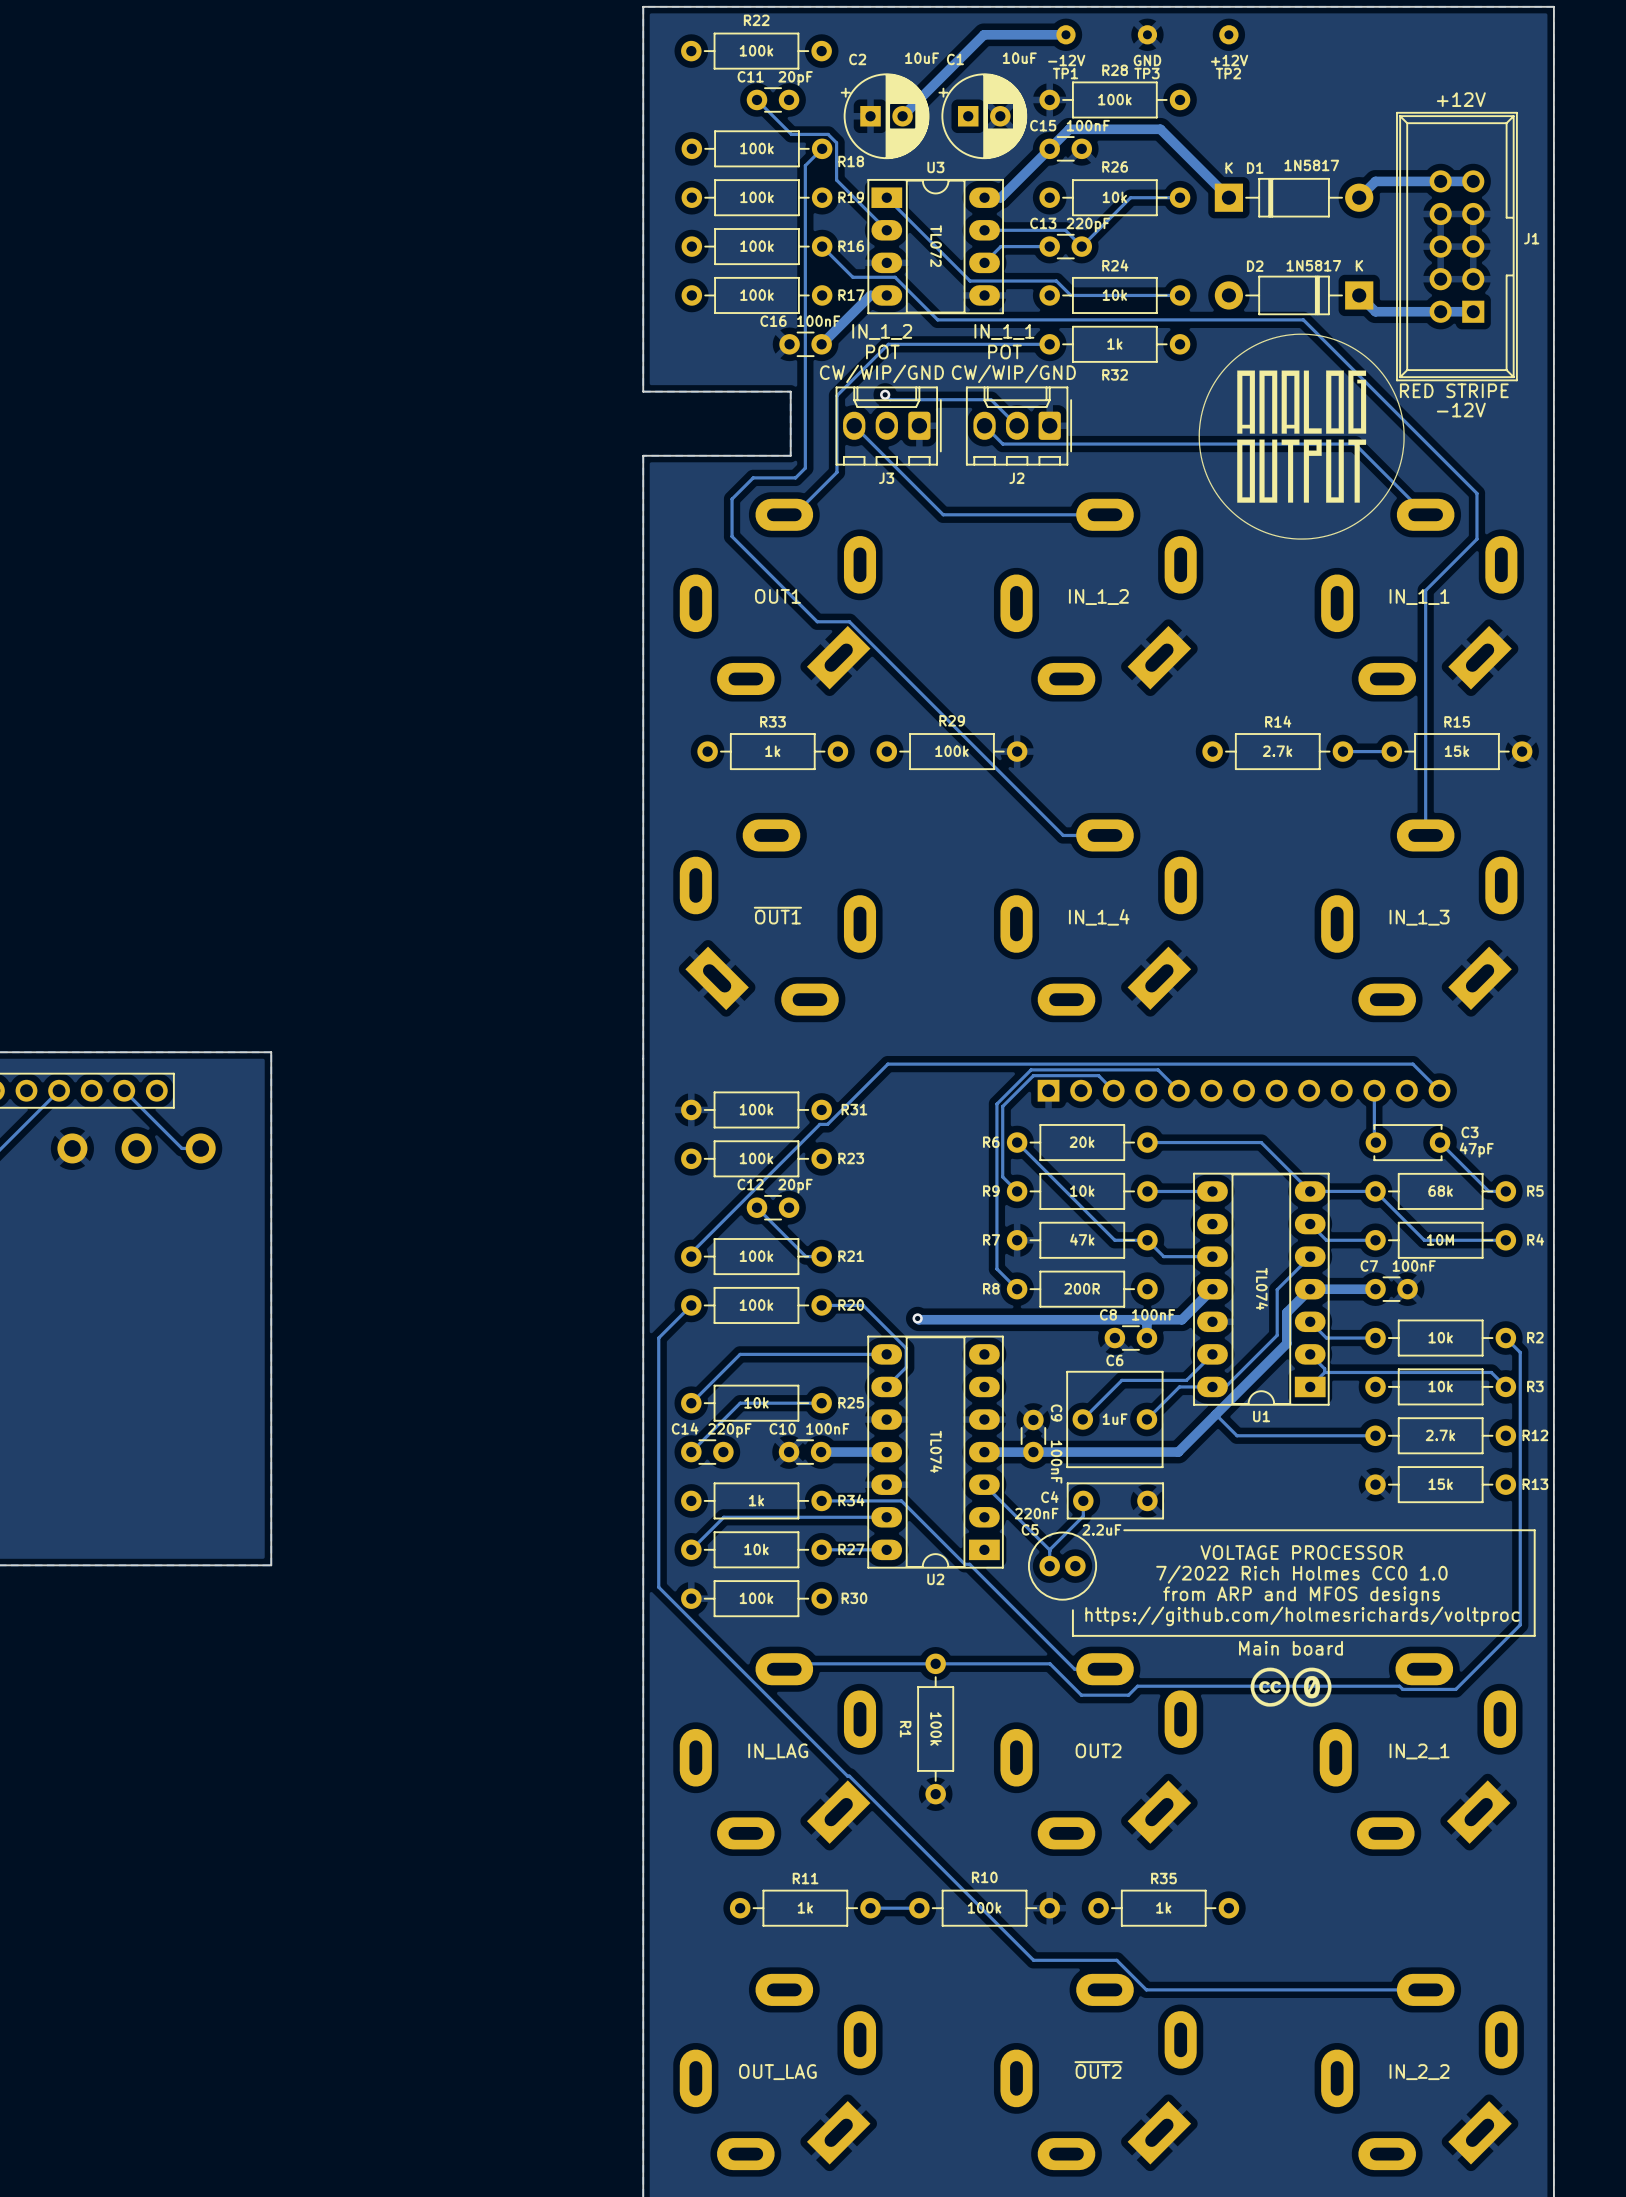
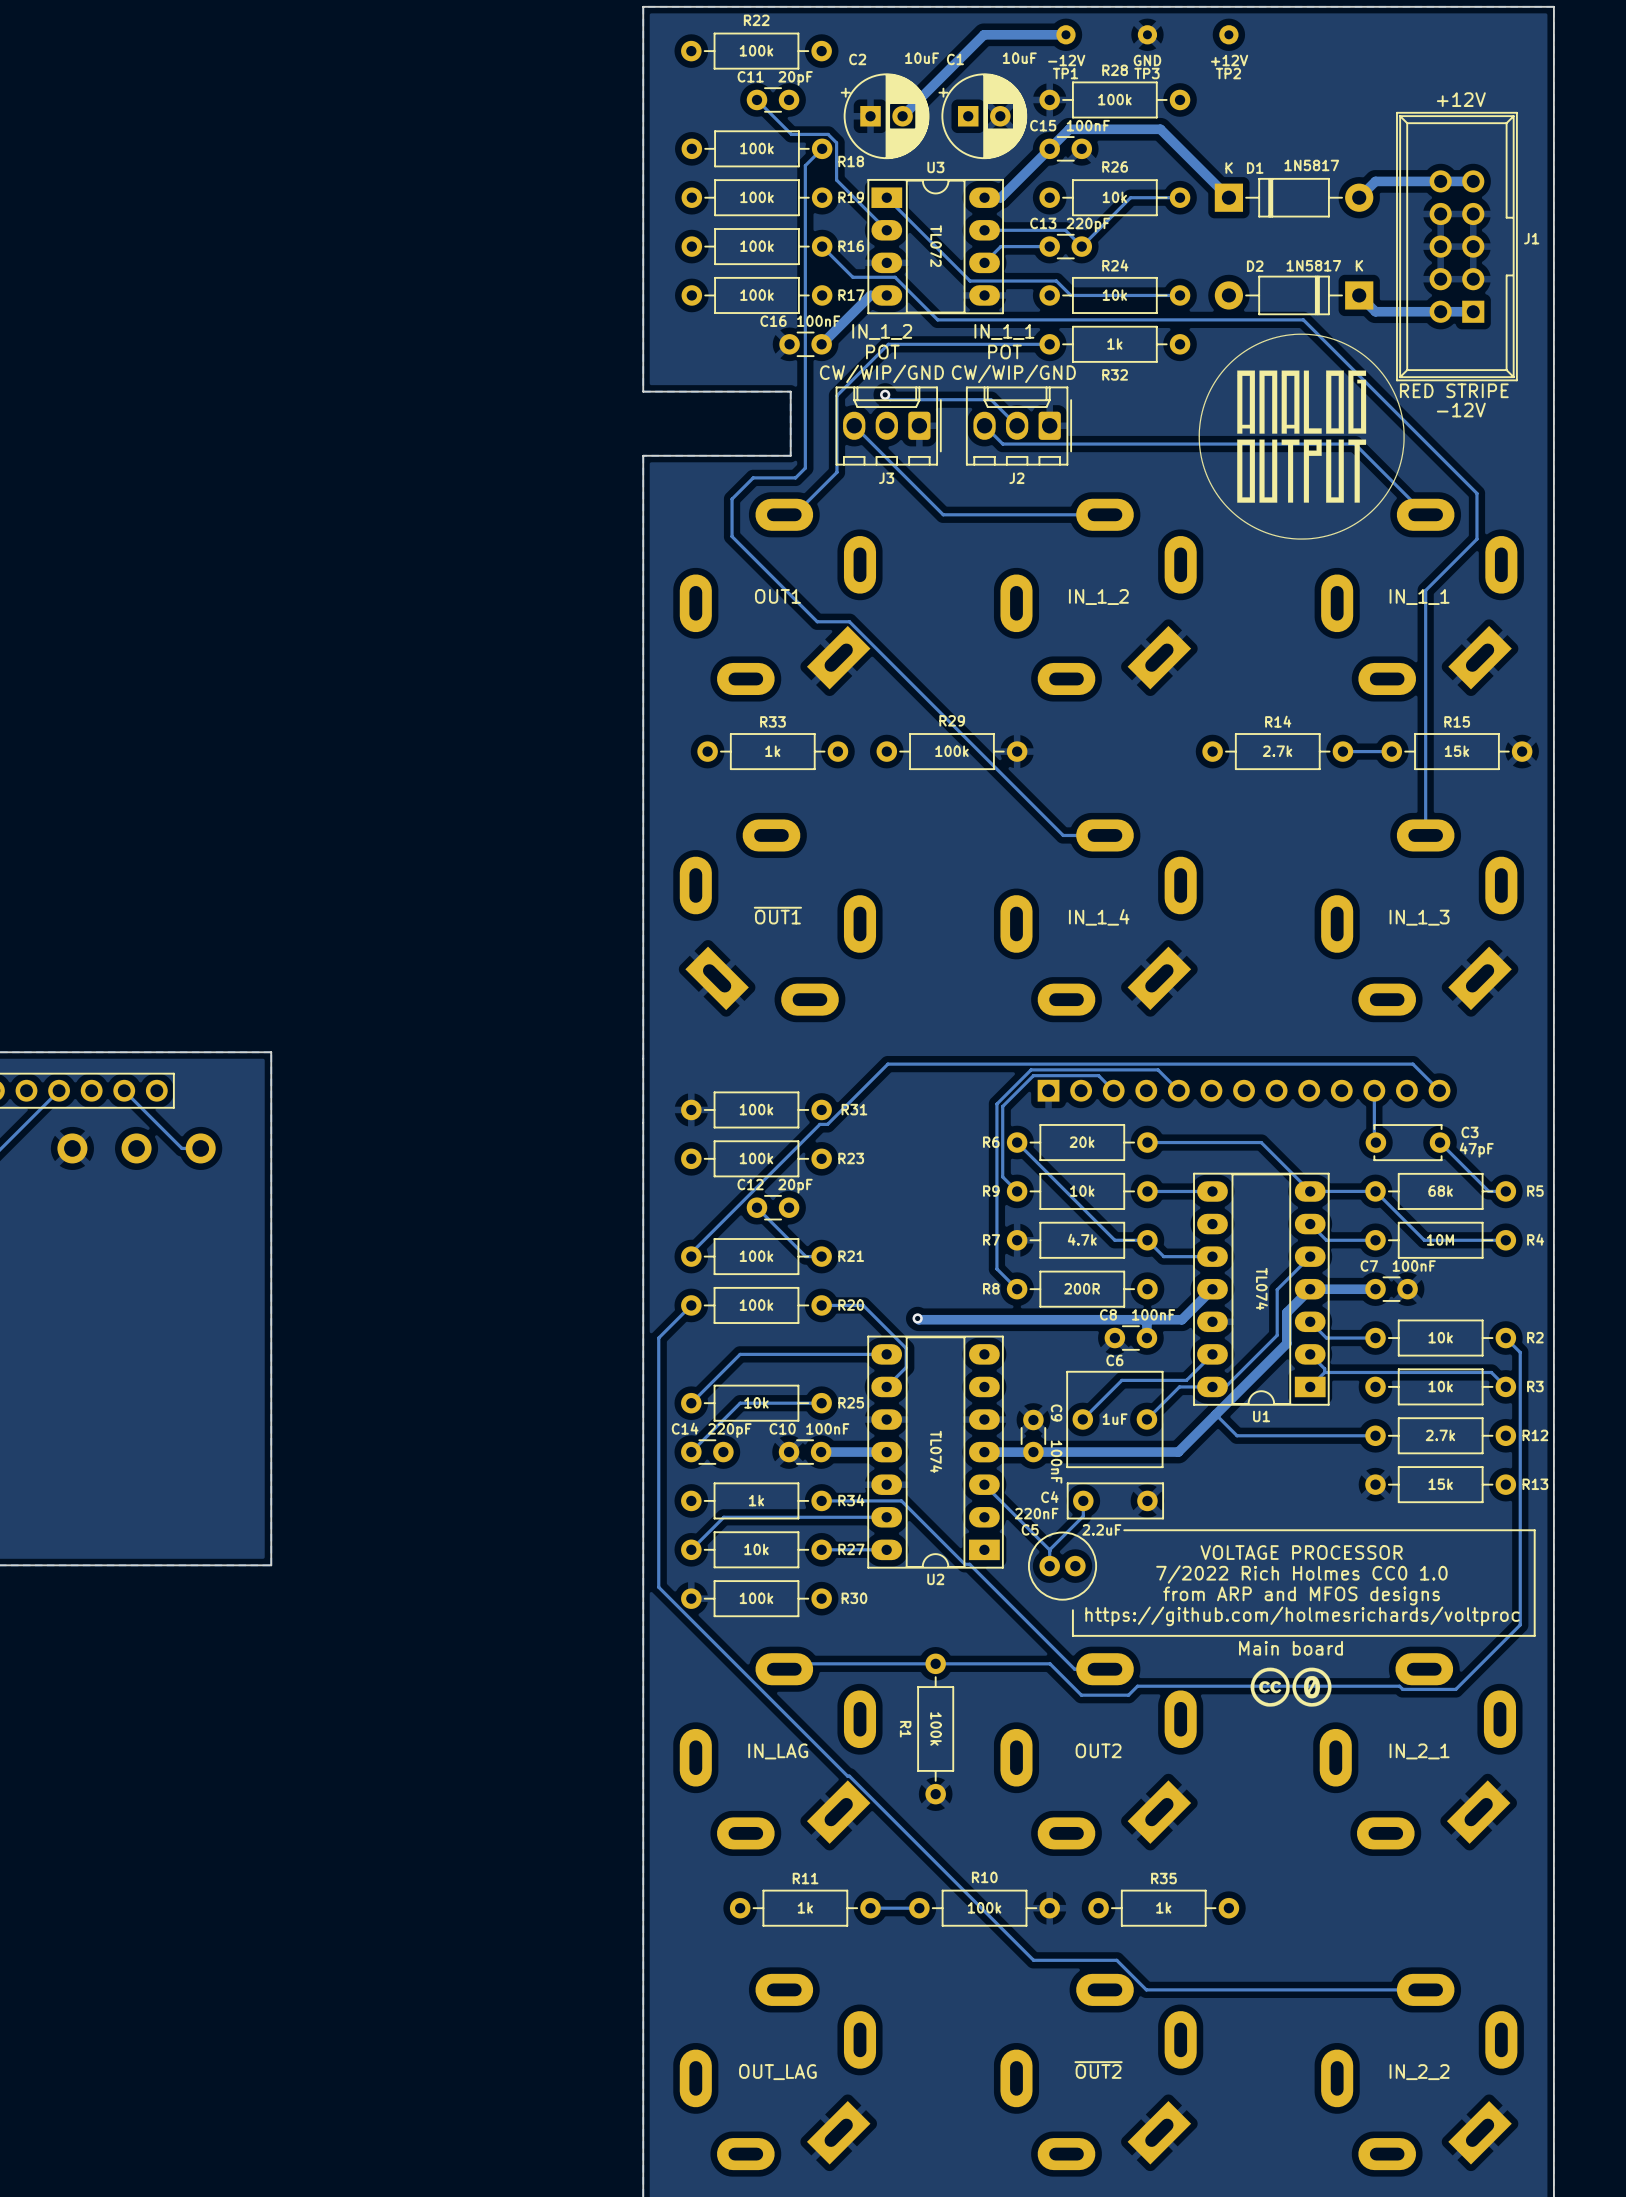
R7 value: 47k (1082, 1239) -> 4.7k (1082, 1239)

